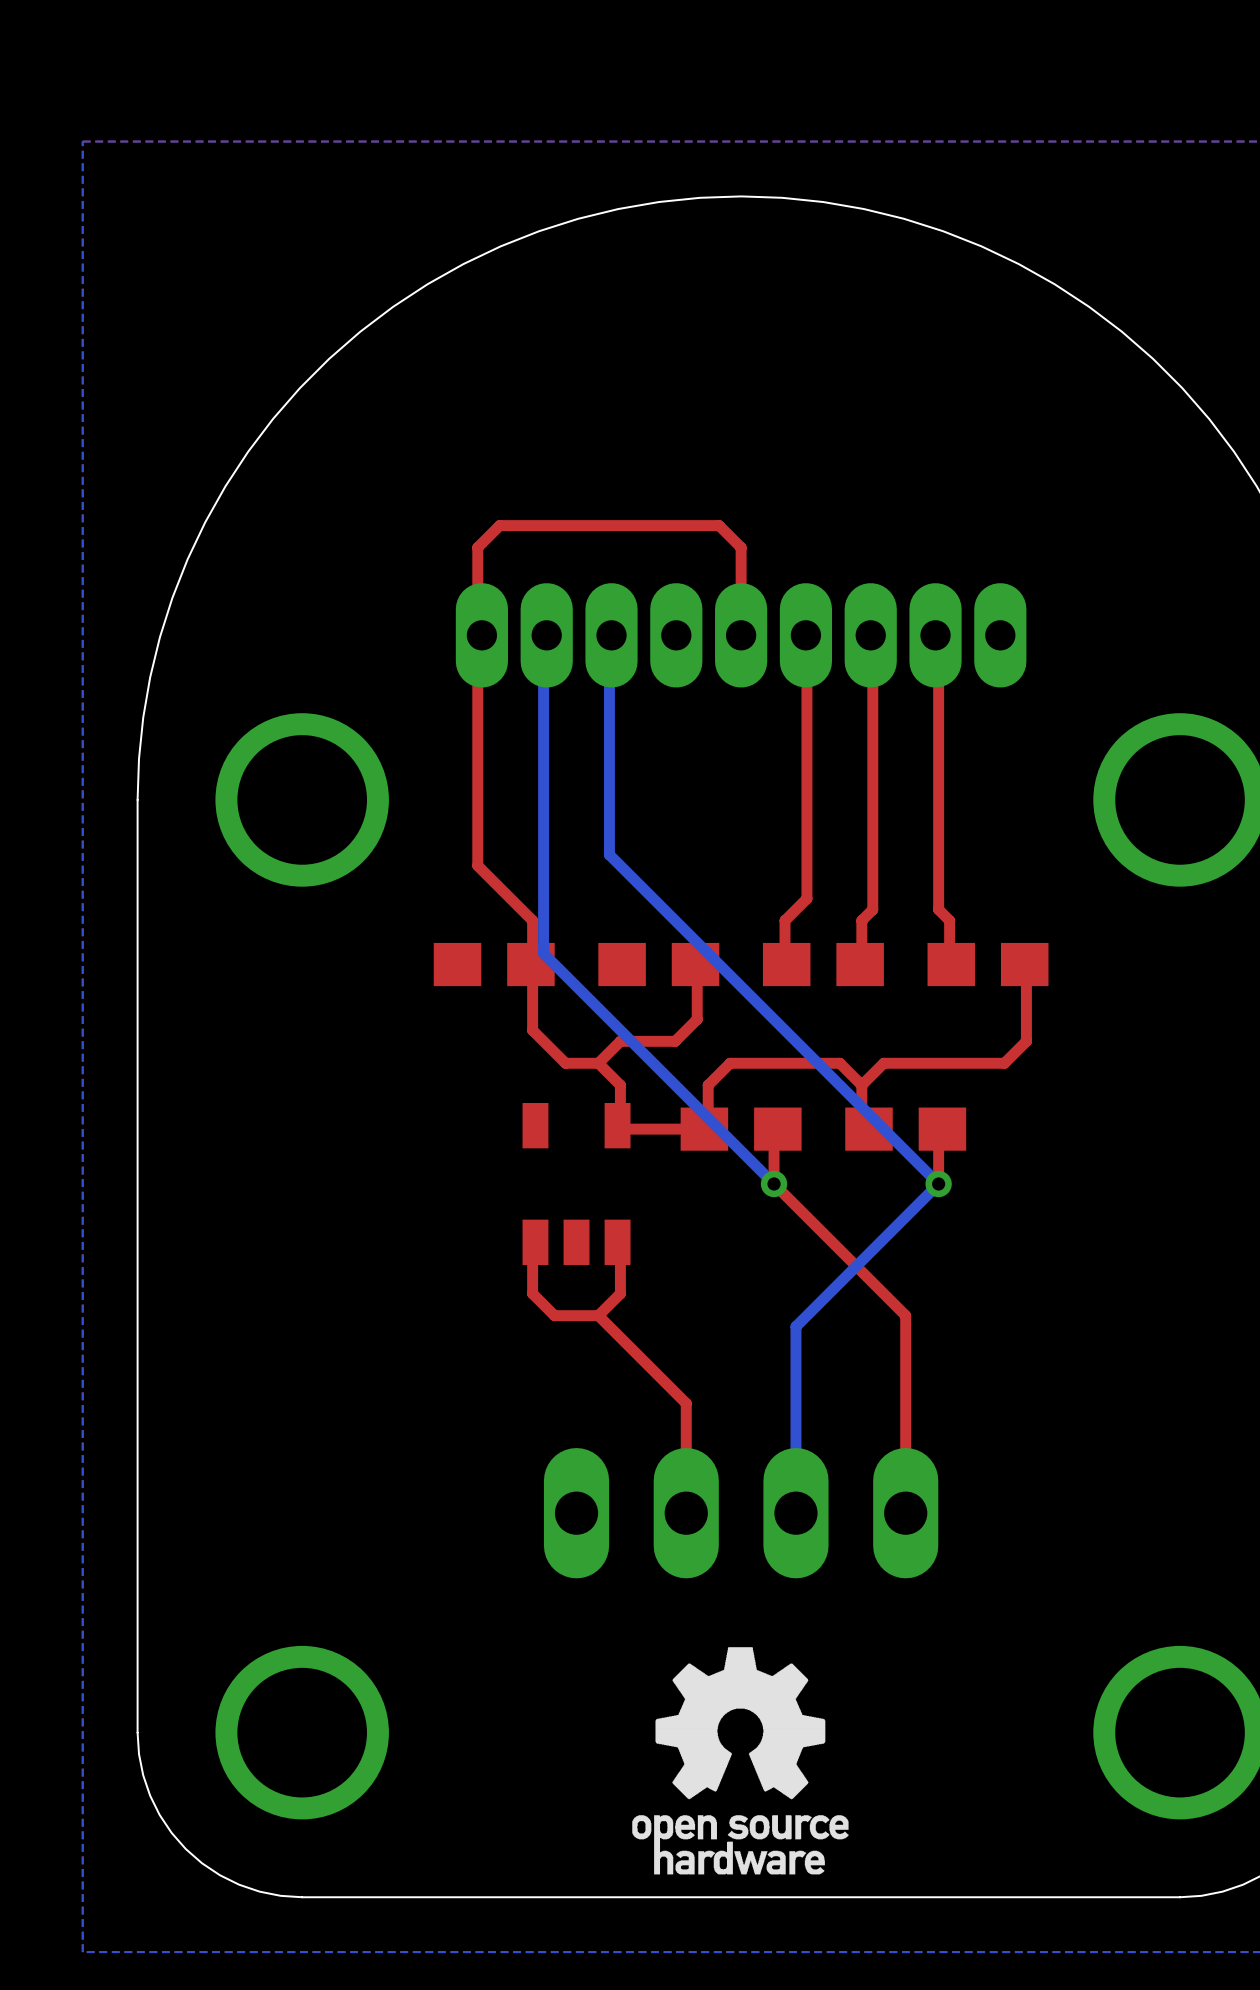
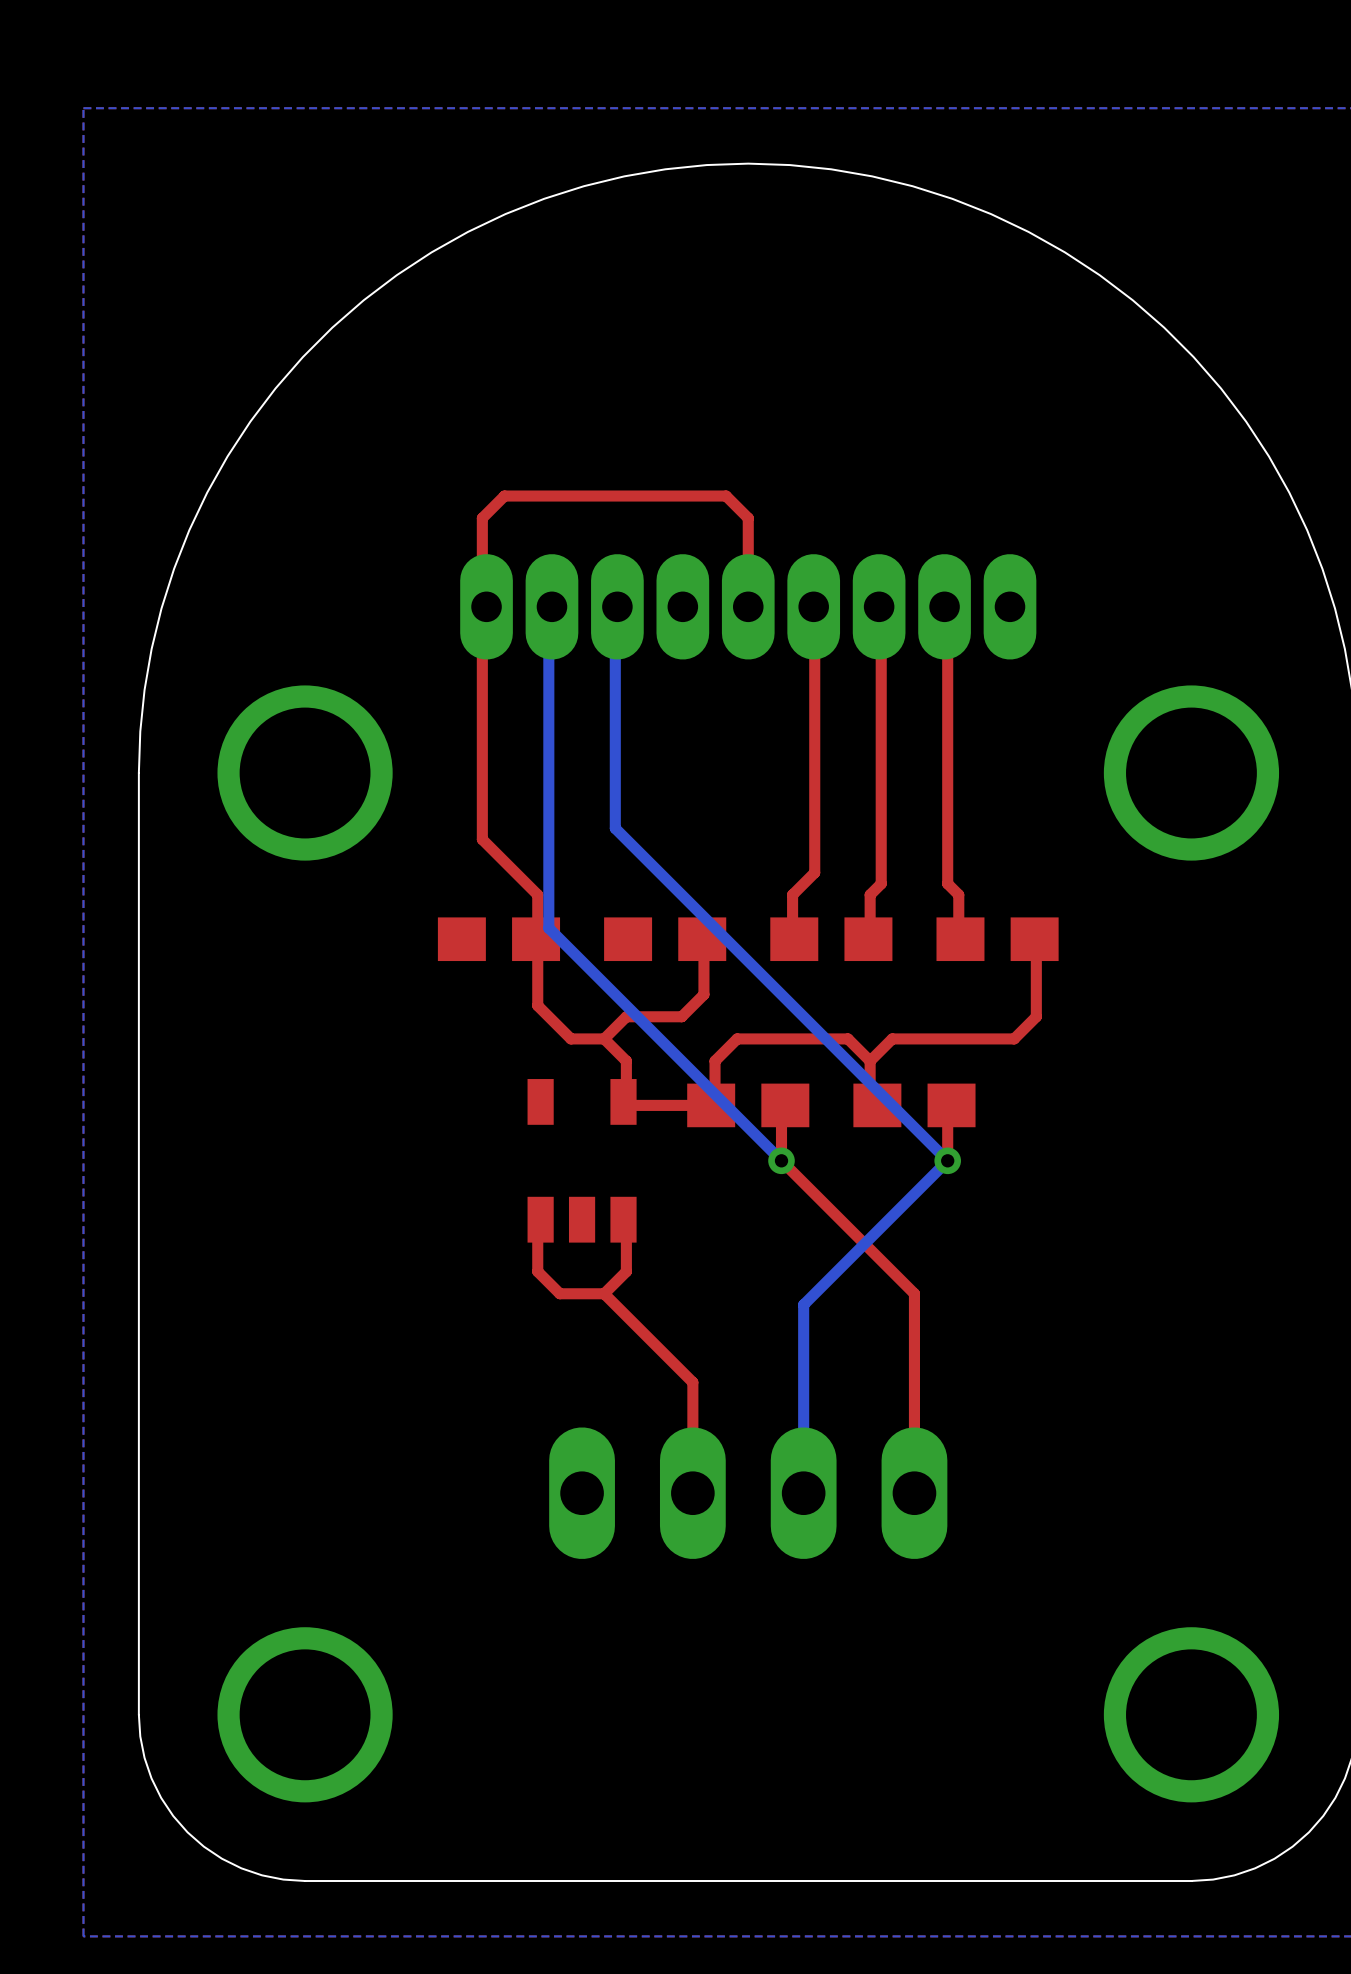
drawing: [632, 1647, 849, 1875] -> none

